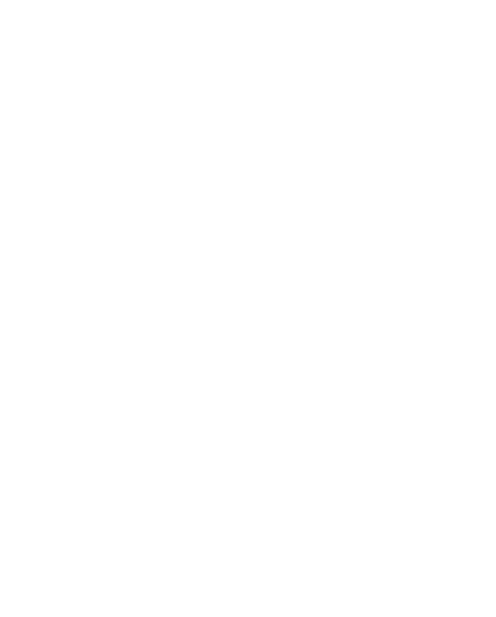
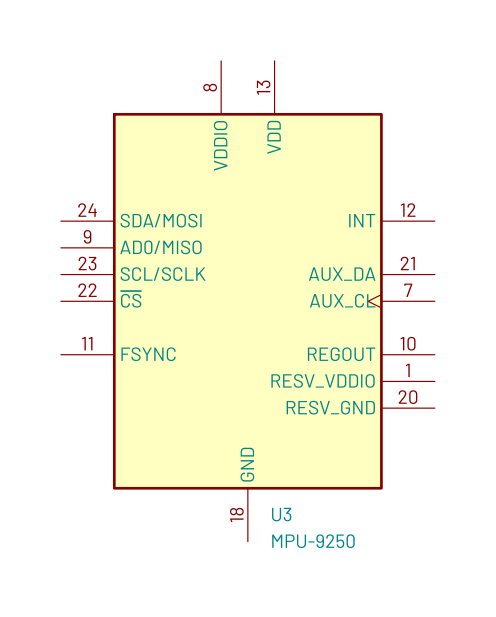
U3: none -> MPU-9250 (247, 301)

